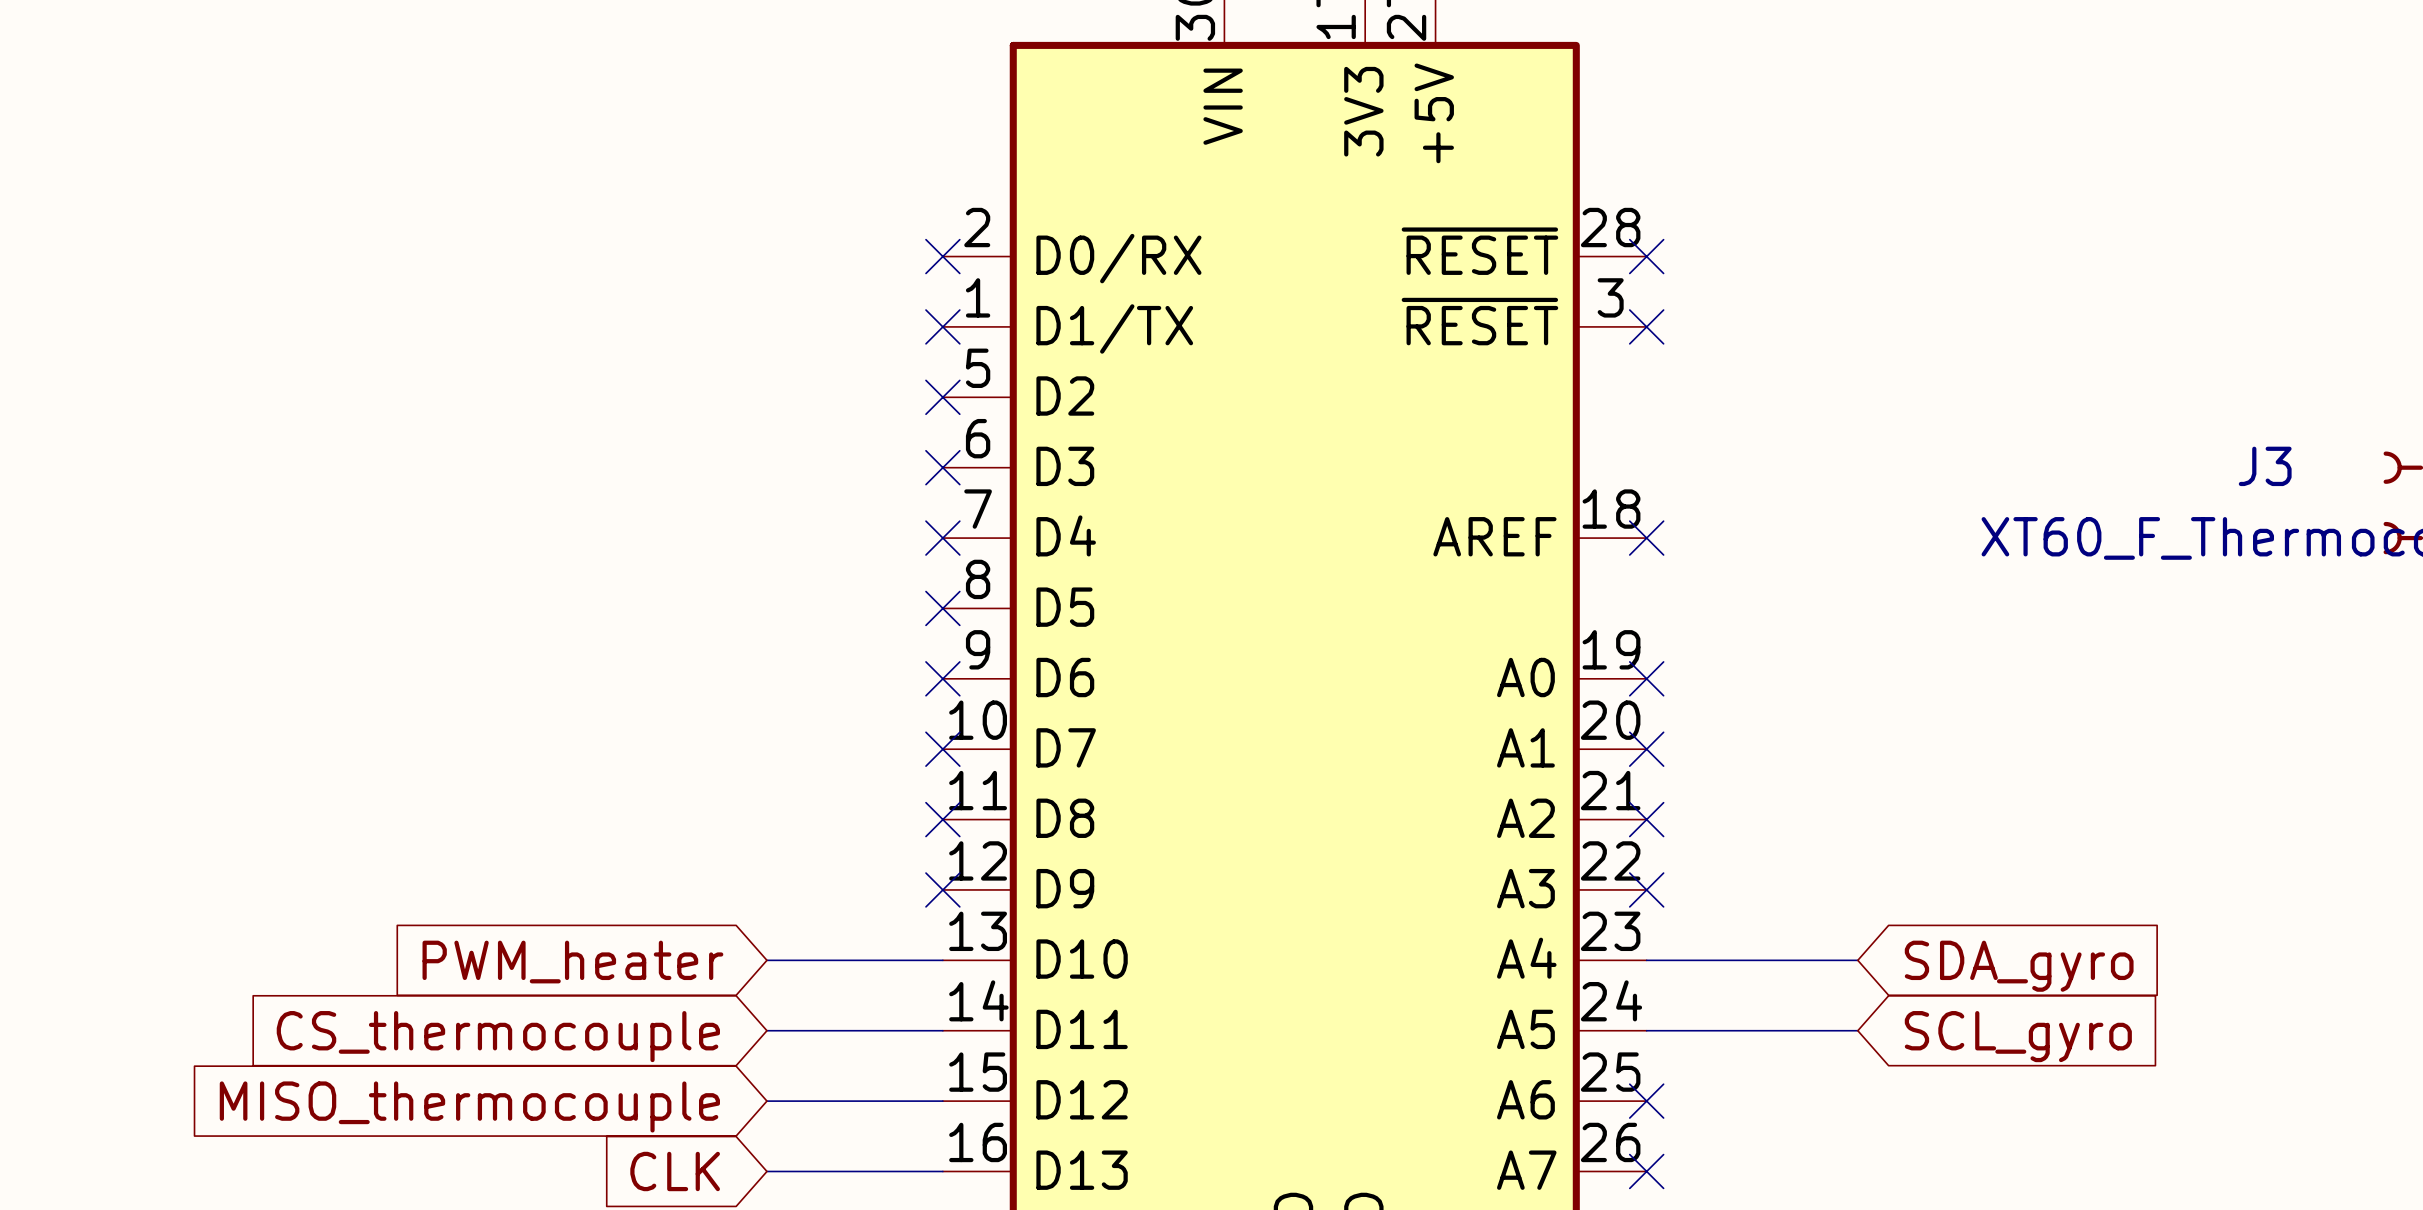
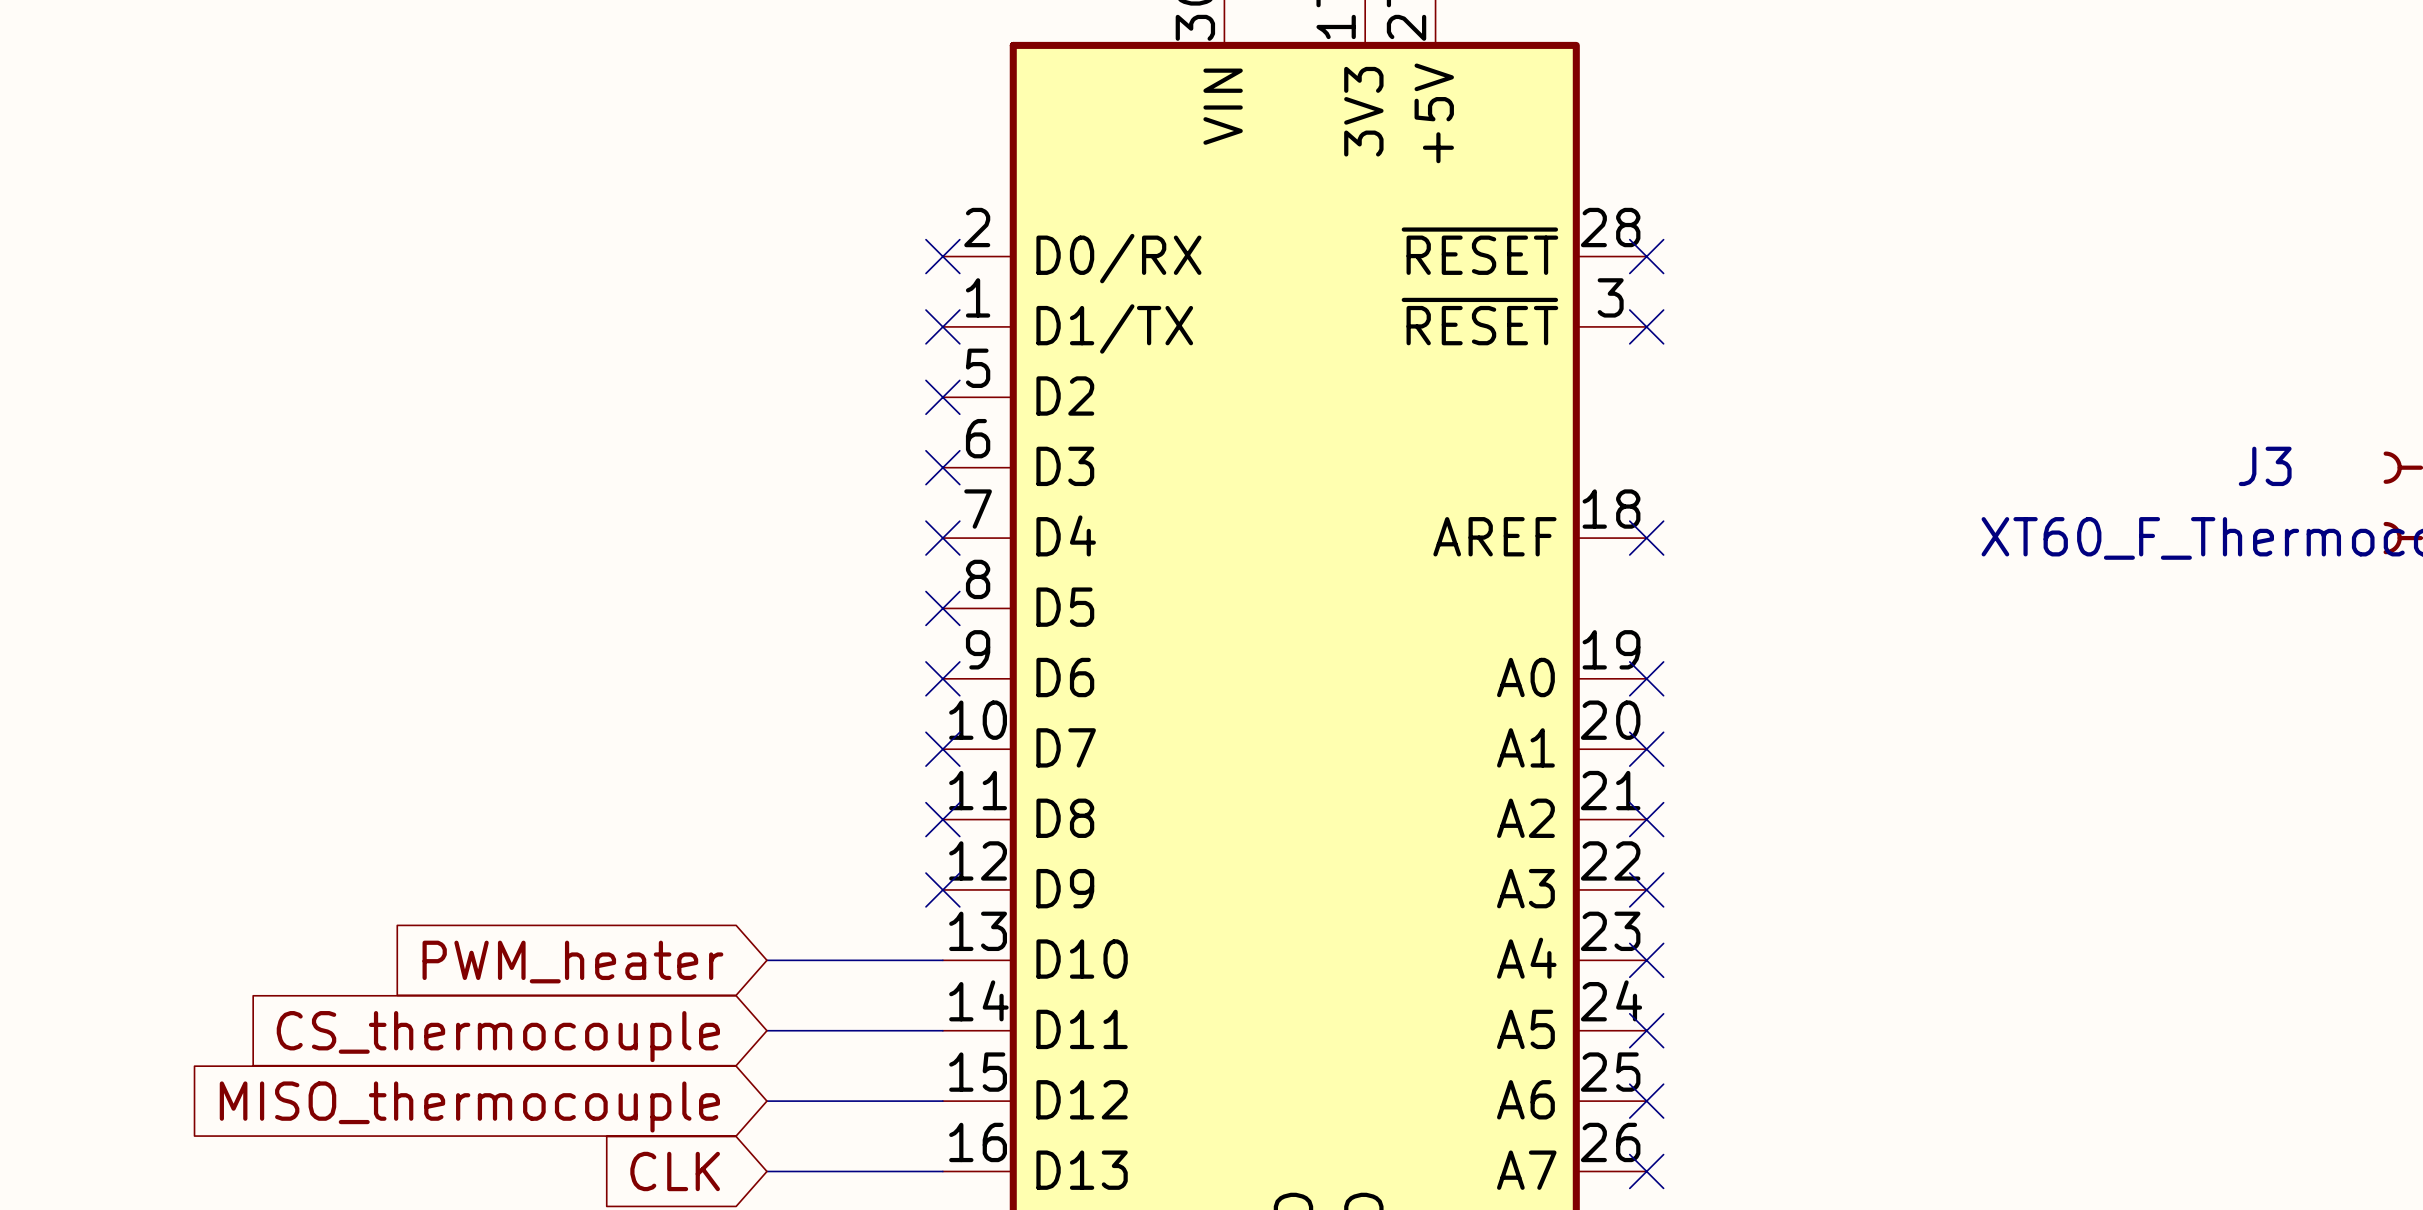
wire: (1646, 960) (1857, 960) -> none
no-connect mark: none -> (1646, 960)
global label: SDA_gyro (2019, 966) -> none
wire: (1646, 1030) (1857, 1030) -> none
no-connect mark: none -> (1646, 1030)
global label: SCL_gyro (2018, 1036) -> none

